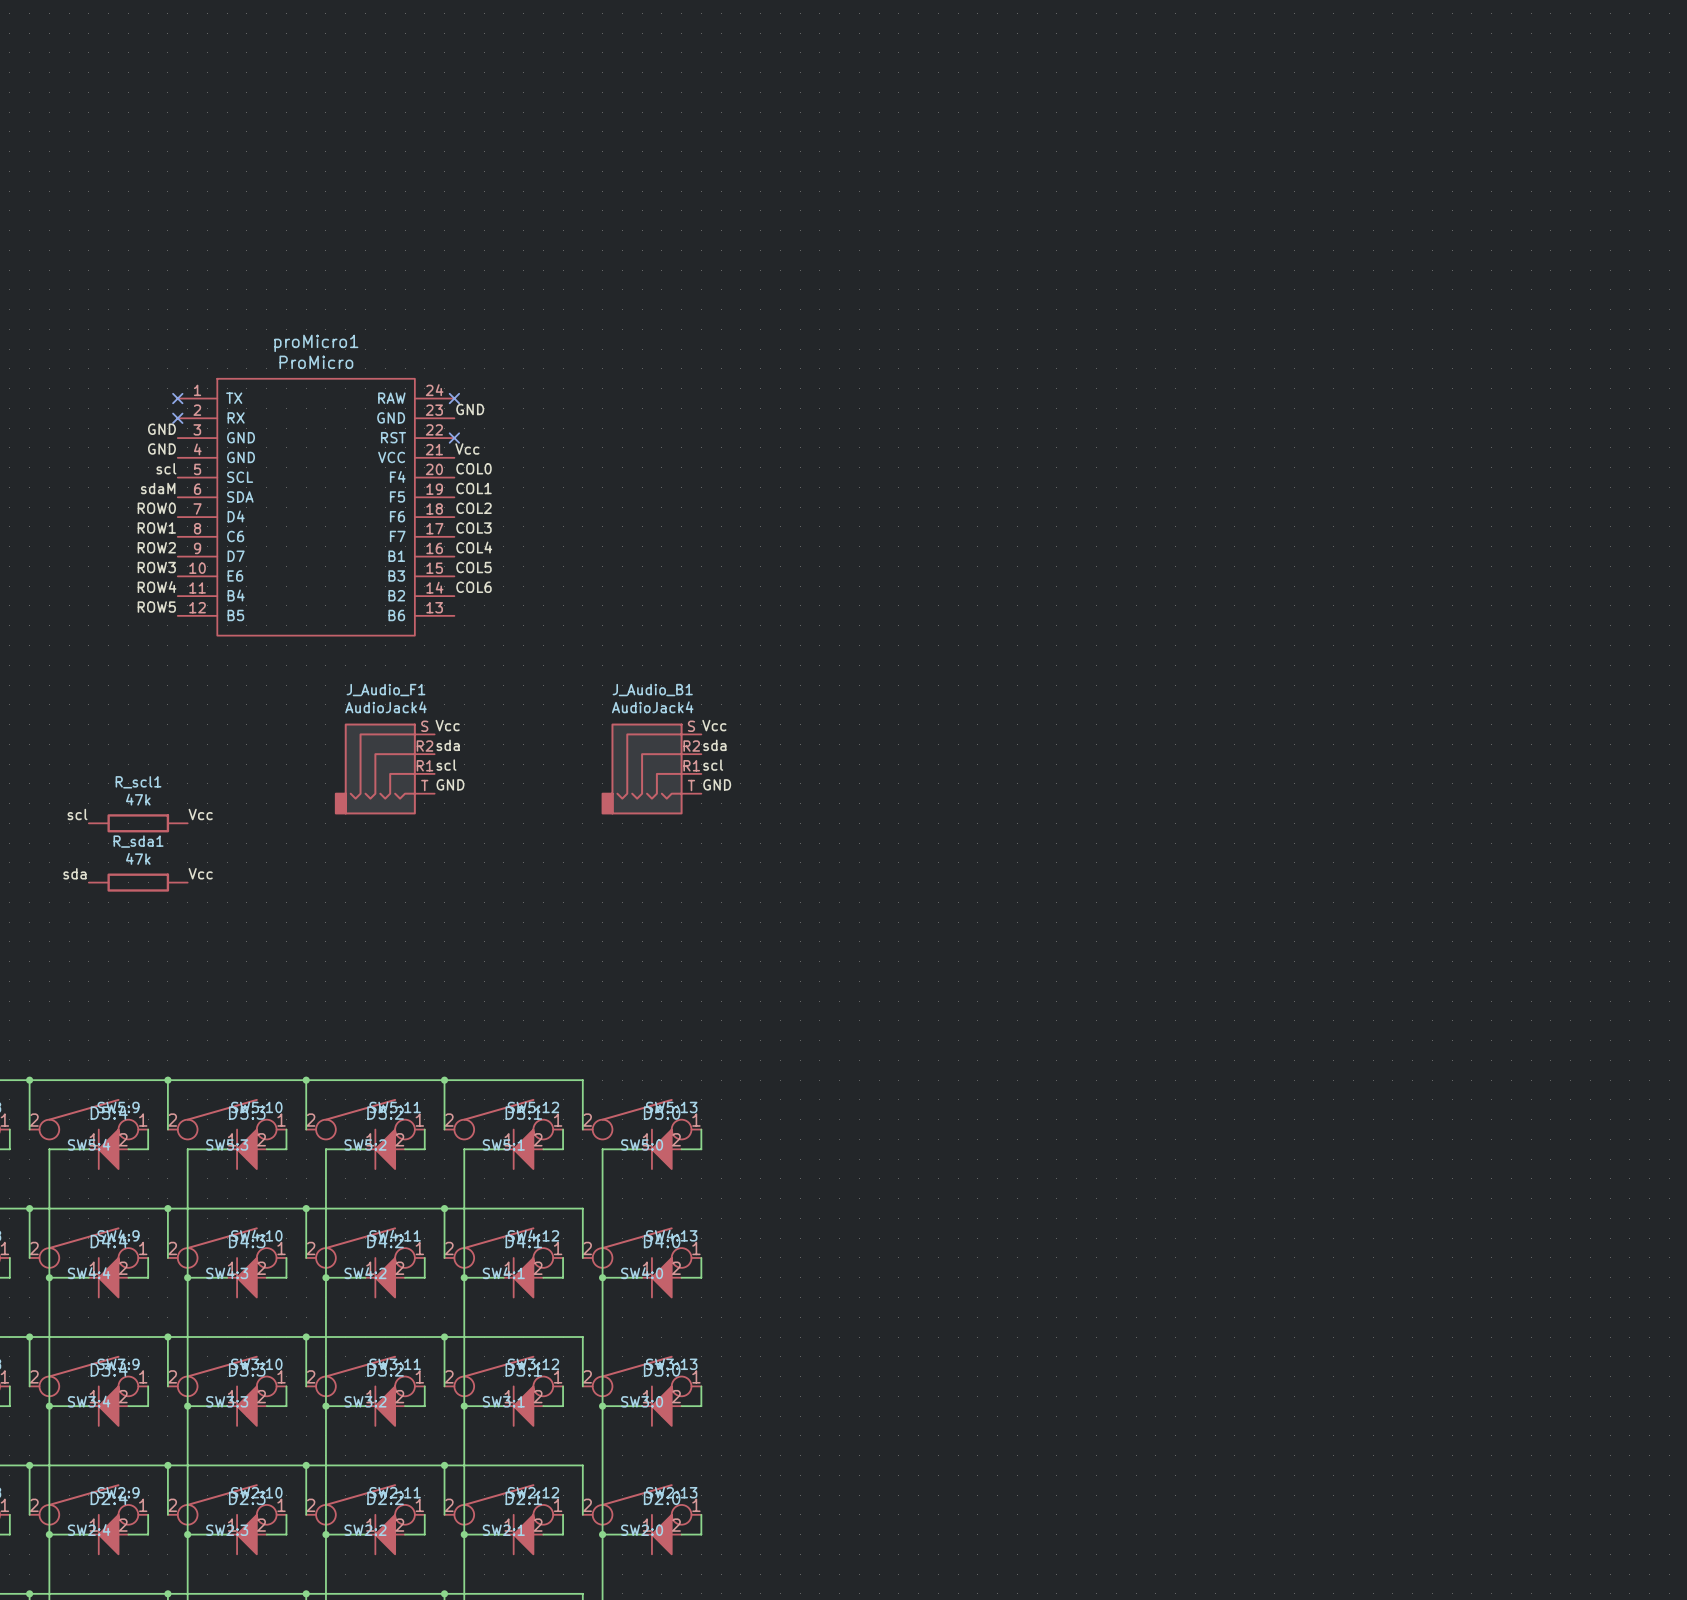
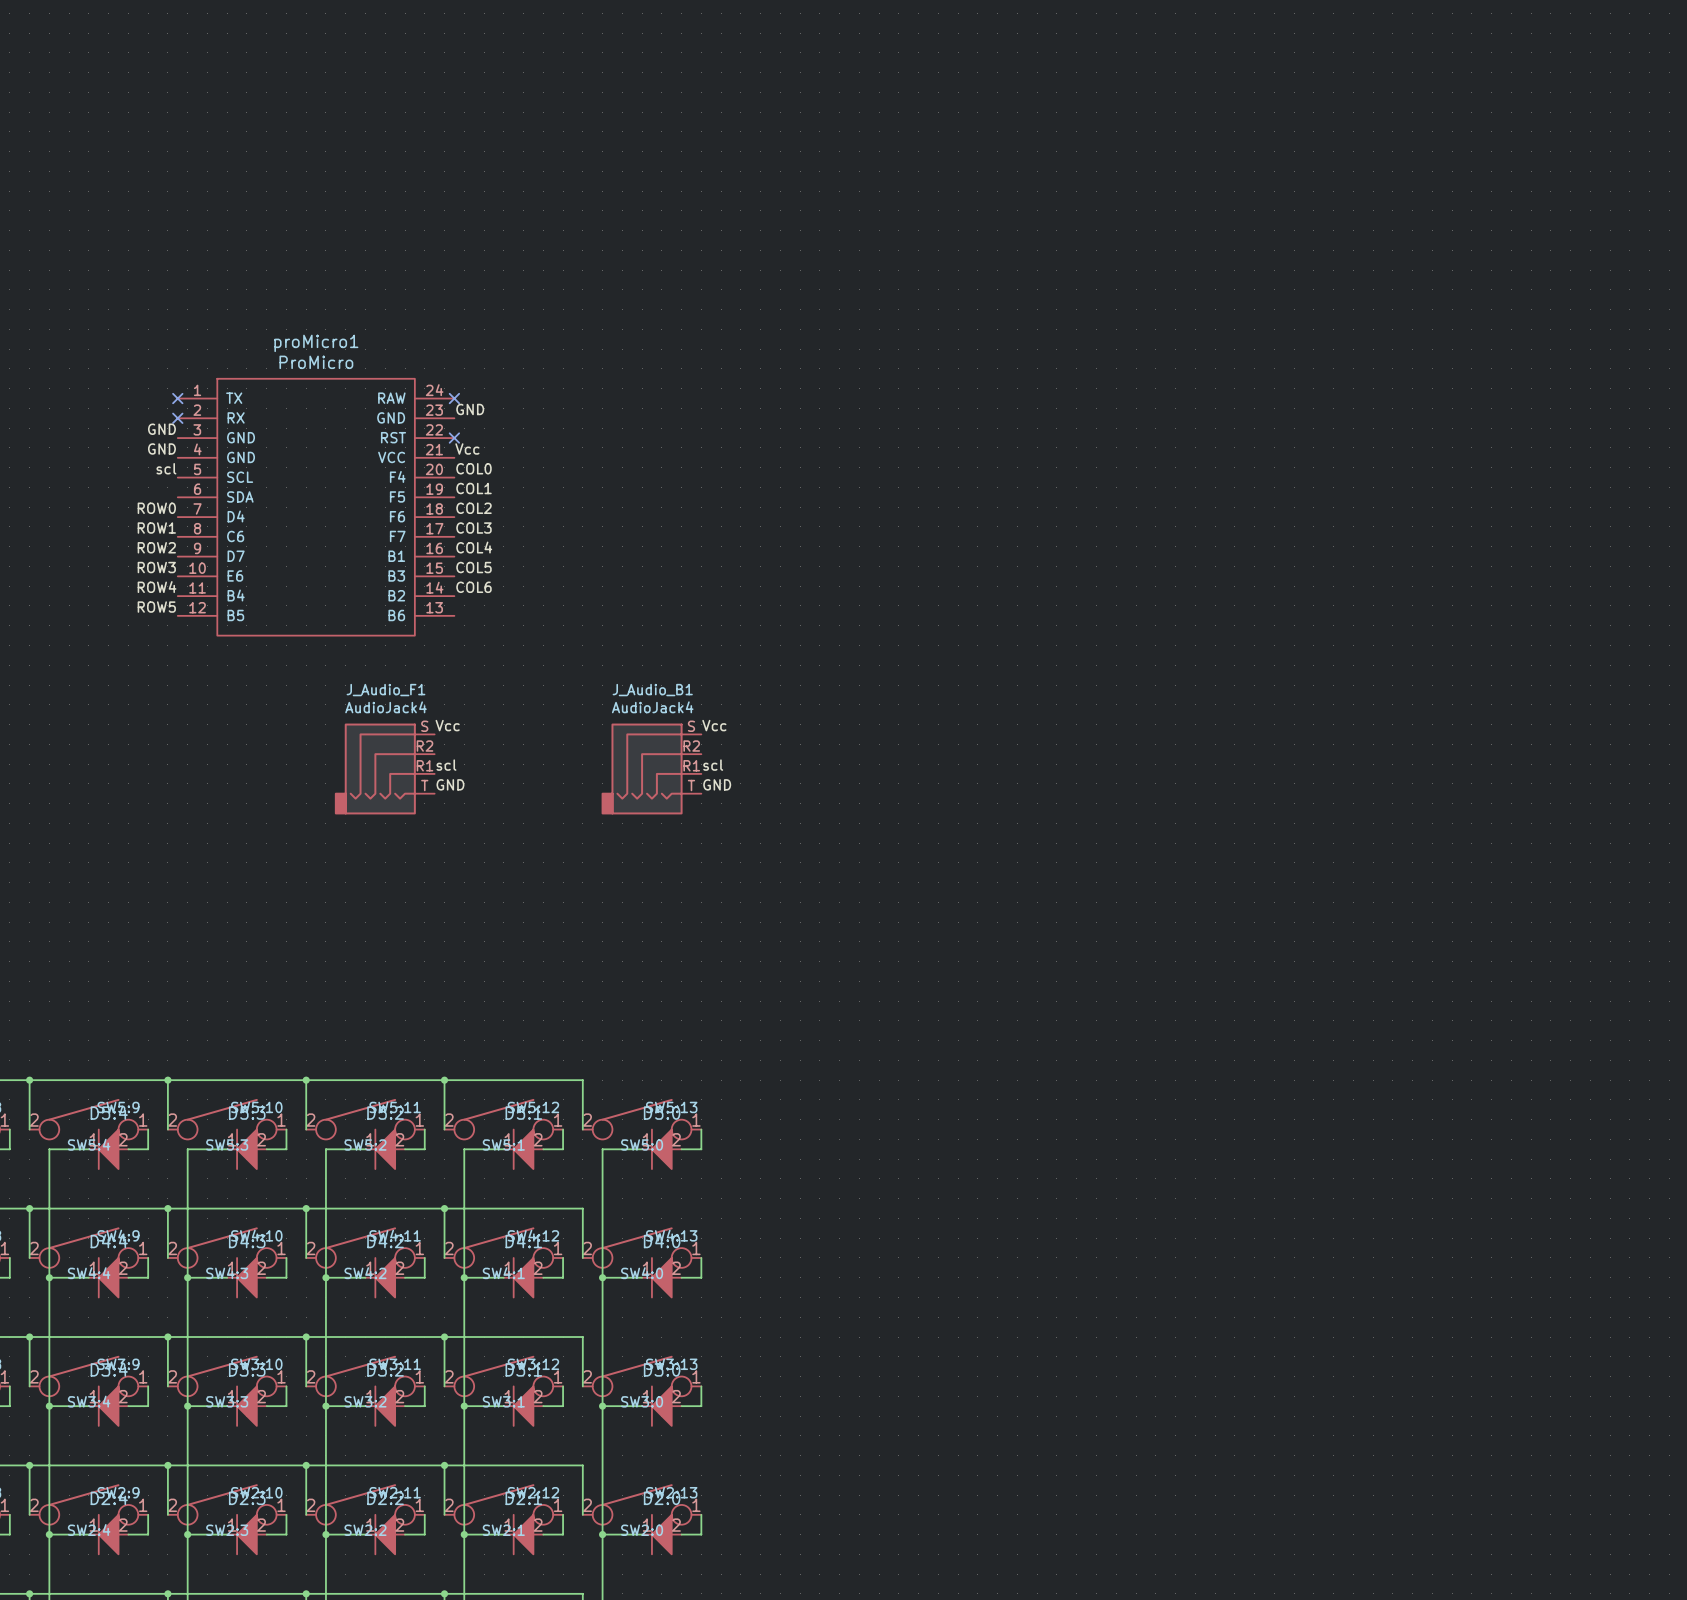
label: sdaM (158, 488) -> none
label: sda (448, 745) -> none
label: sda (714, 745) -> none
label: scl (77, 814) -> none
label: Vcc (200, 814) -> none
R_scl1: 47k (138, 823) -> none
label: sda (74, 873) -> none
label: Vcc (200, 873) -> none
R_sda1: 47k (138, 882) -> none

